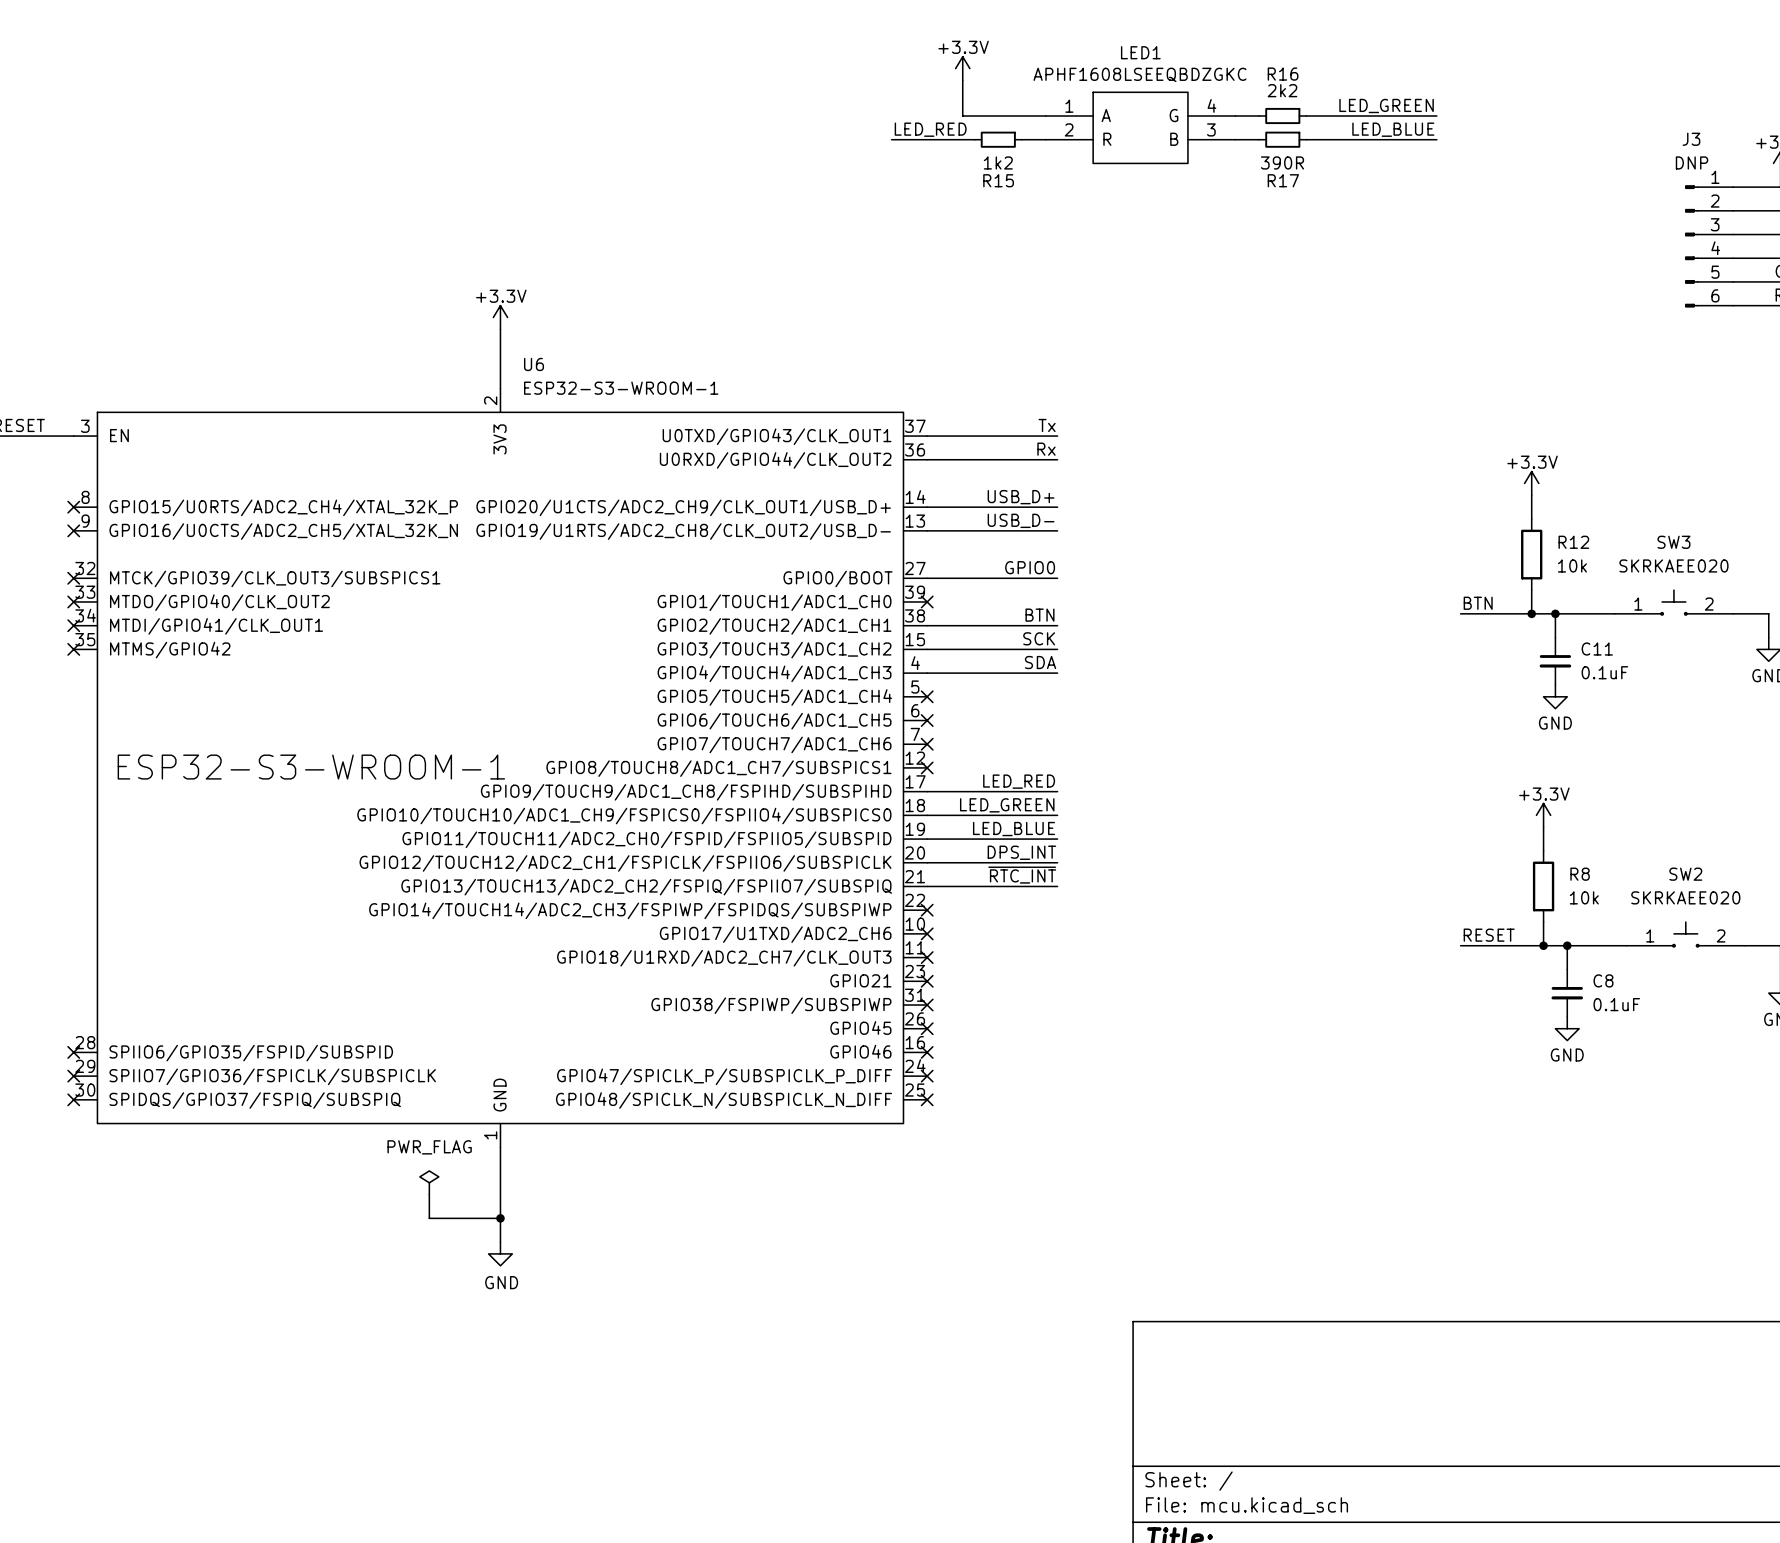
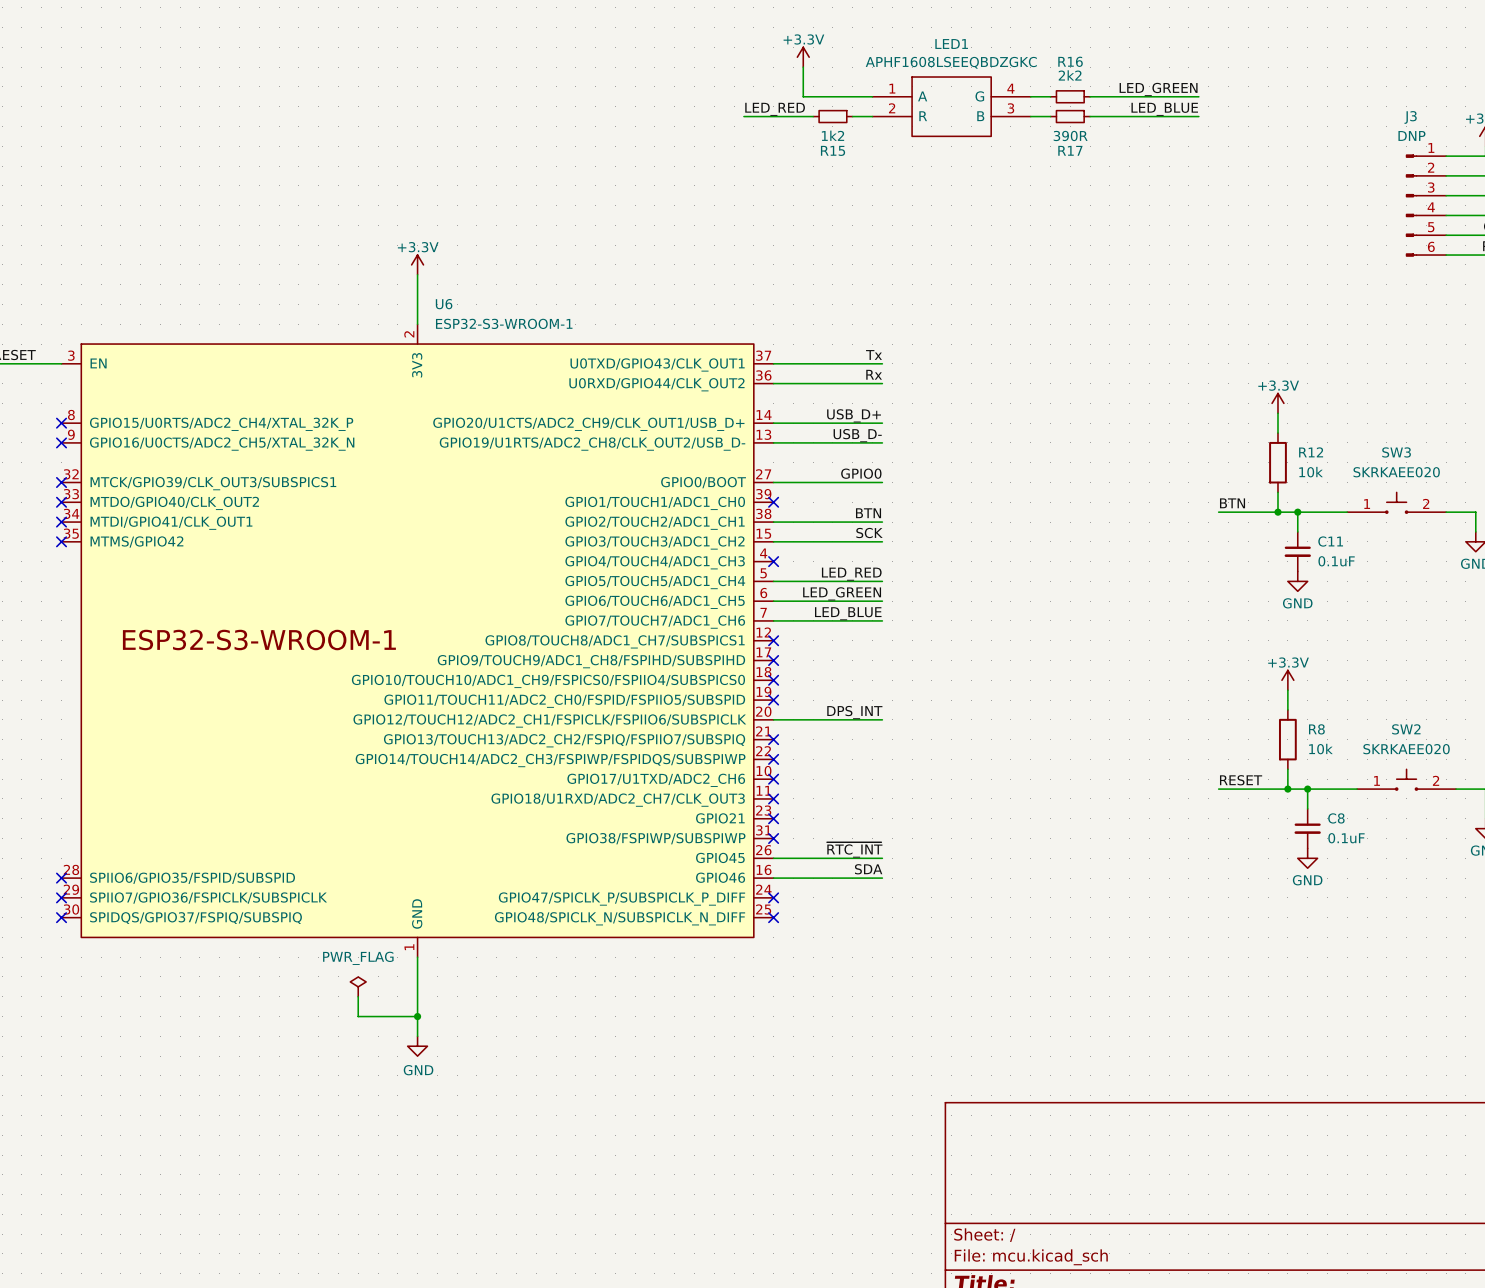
label: SDA (1040, 662) -> none
wire: (927, 673) (1057, 673) -> none
no-connect mark: none -> (773, 561)
no-connect mark: (927, 696) -> none
no-connect mark: (927, 720) -> none
no-connect mark: (927, 744) -> none
label position: LED_RED (1019, 781) -> LED_RED (851, 574)
wire: (927, 791) (1057, 791) -> (773, 581) (882, 581)
no-connect mark: none -> (773, 660)
label position: LED_GREEN (1007, 805) -> LED_GREEN (842, 593)
wire: (927, 815) (1057, 815) -> (773, 601) (882, 601)
no-connect mark: none -> (773, 680)
label position: LED_BLUE (1014, 829) -> LED_BLUE (848, 613)
wire: (927, 839) (1057, 839) -> (773, 620) (882, 620)
no-connect mark: none -> (773, 700)
label position: ~{RTC_INT} (1022, 875) -> ~{RTC_INT} (854, 849)
wire: (927, 886) (1057, 886) -> (773, 858) (882, 858)
no-connect mark: none -> (773, 739)
no-connect mark: (927, 1028) -> none
label: none -> SDA (868, 869)
wire: none -> (773, 878) (882, 878)
no-connect mark: (927, 1052) -> none

